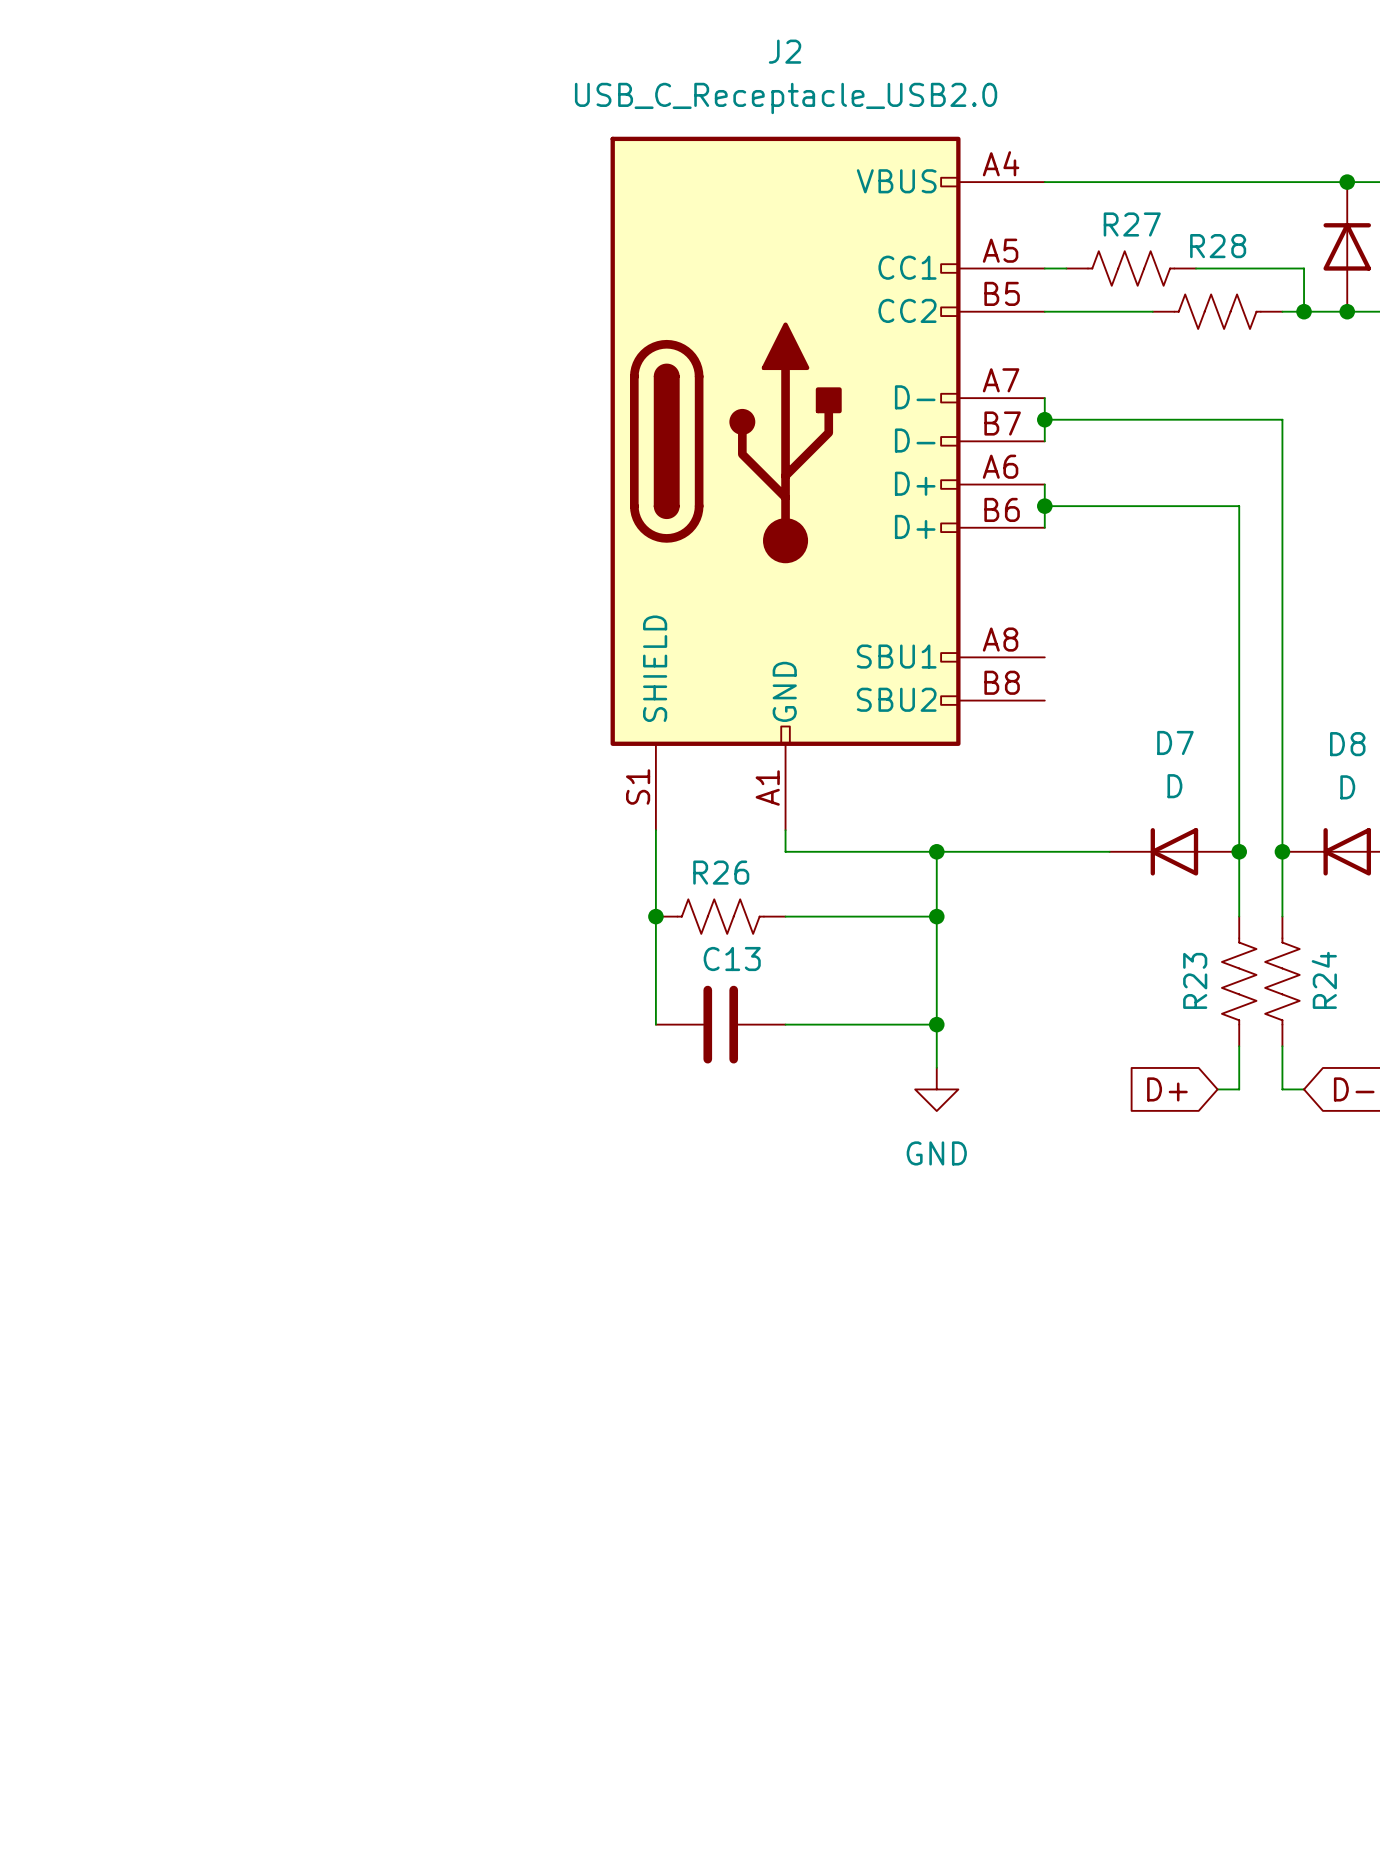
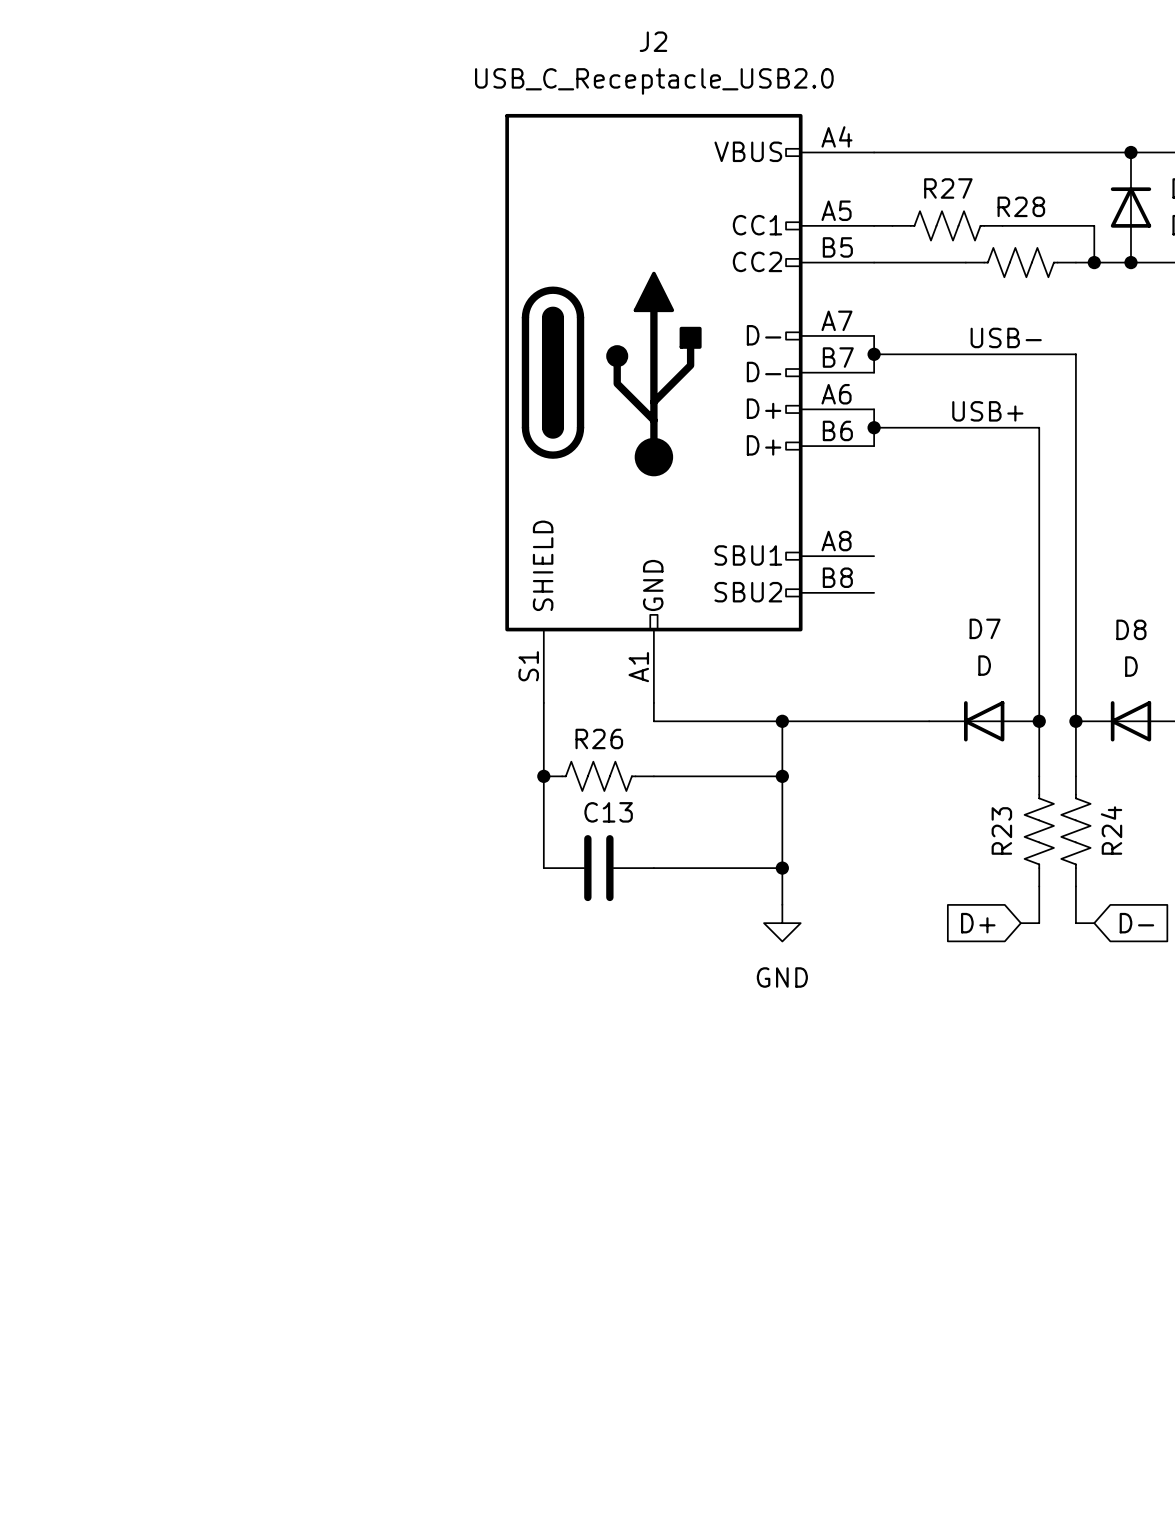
label: none -> USB- (1006, 337)
label: none -> USB+ (987, 411)

